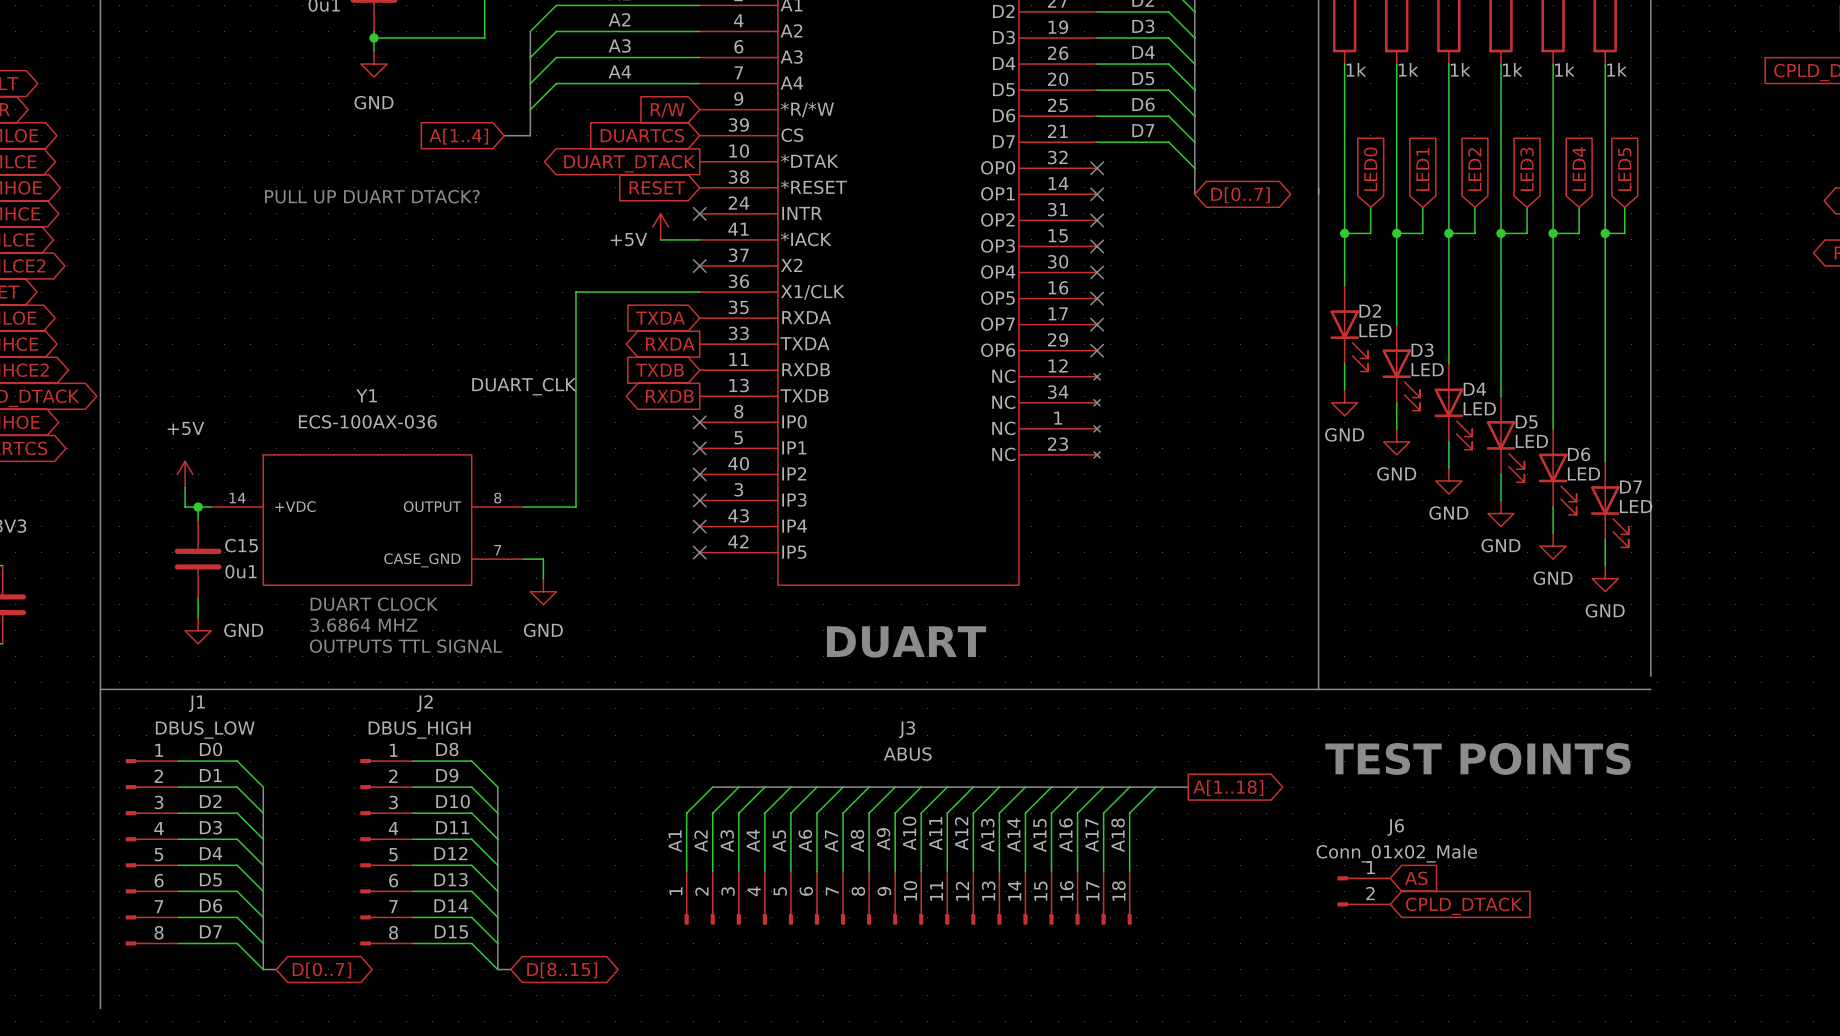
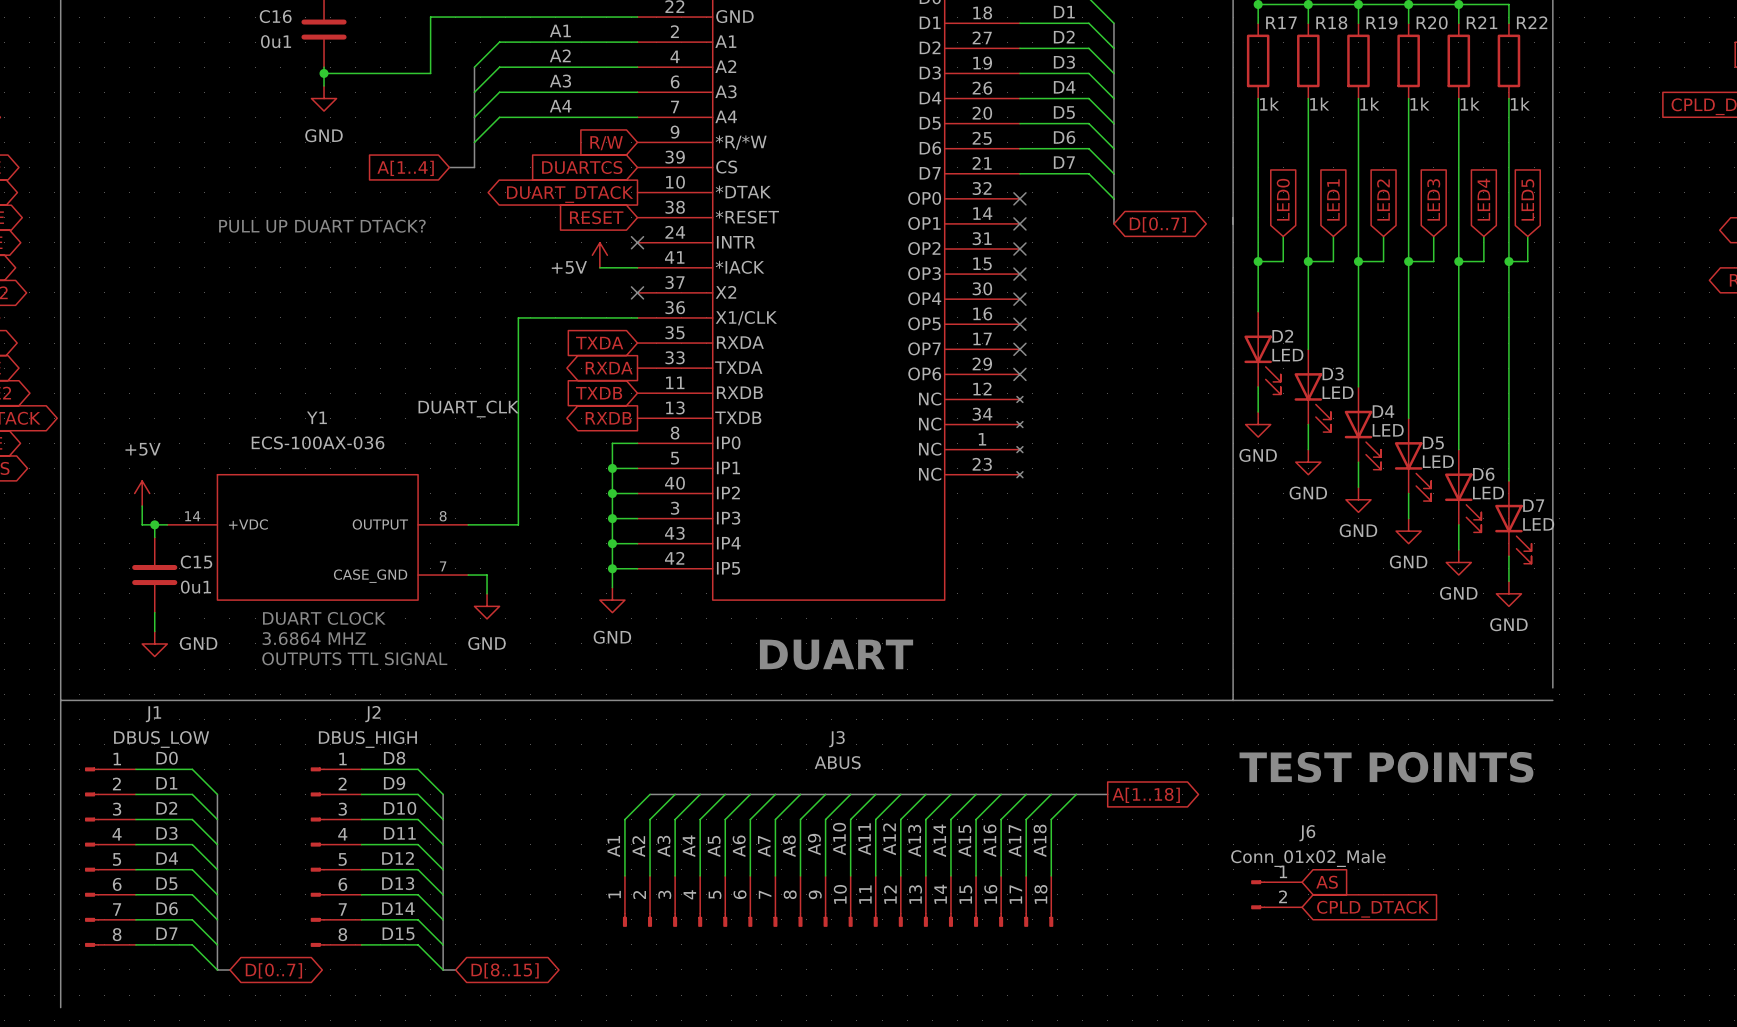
wire: none -> (637, 443) (612, 443) (612, 587)
no-connect mark: (699, 422) -> none
wire: none -> (612, 468) (637, 468)
junction: none -> (612, 468)
no-connect mark: (699, 448) -> none
wire: none -> (612, 493) (637, 493)
junction: none -> (612, 493)
no-connect mark: (699, 474) -> none
wire: none -> (612, 518) (637, 518)
junction: none -> (612, 518)
no-connect mark: (699, 500) -> none
wire: none -> (612, 543) (637, 543)
junction: none -> (612, 543)
no-connect mark: (699, 526) -> none
wire: none -> (612, 568) (637, 568)
junction: none -> (612, 568)
no-connect mark: (699, 552) -> none
power symbol: none -> GND (612, 600)

